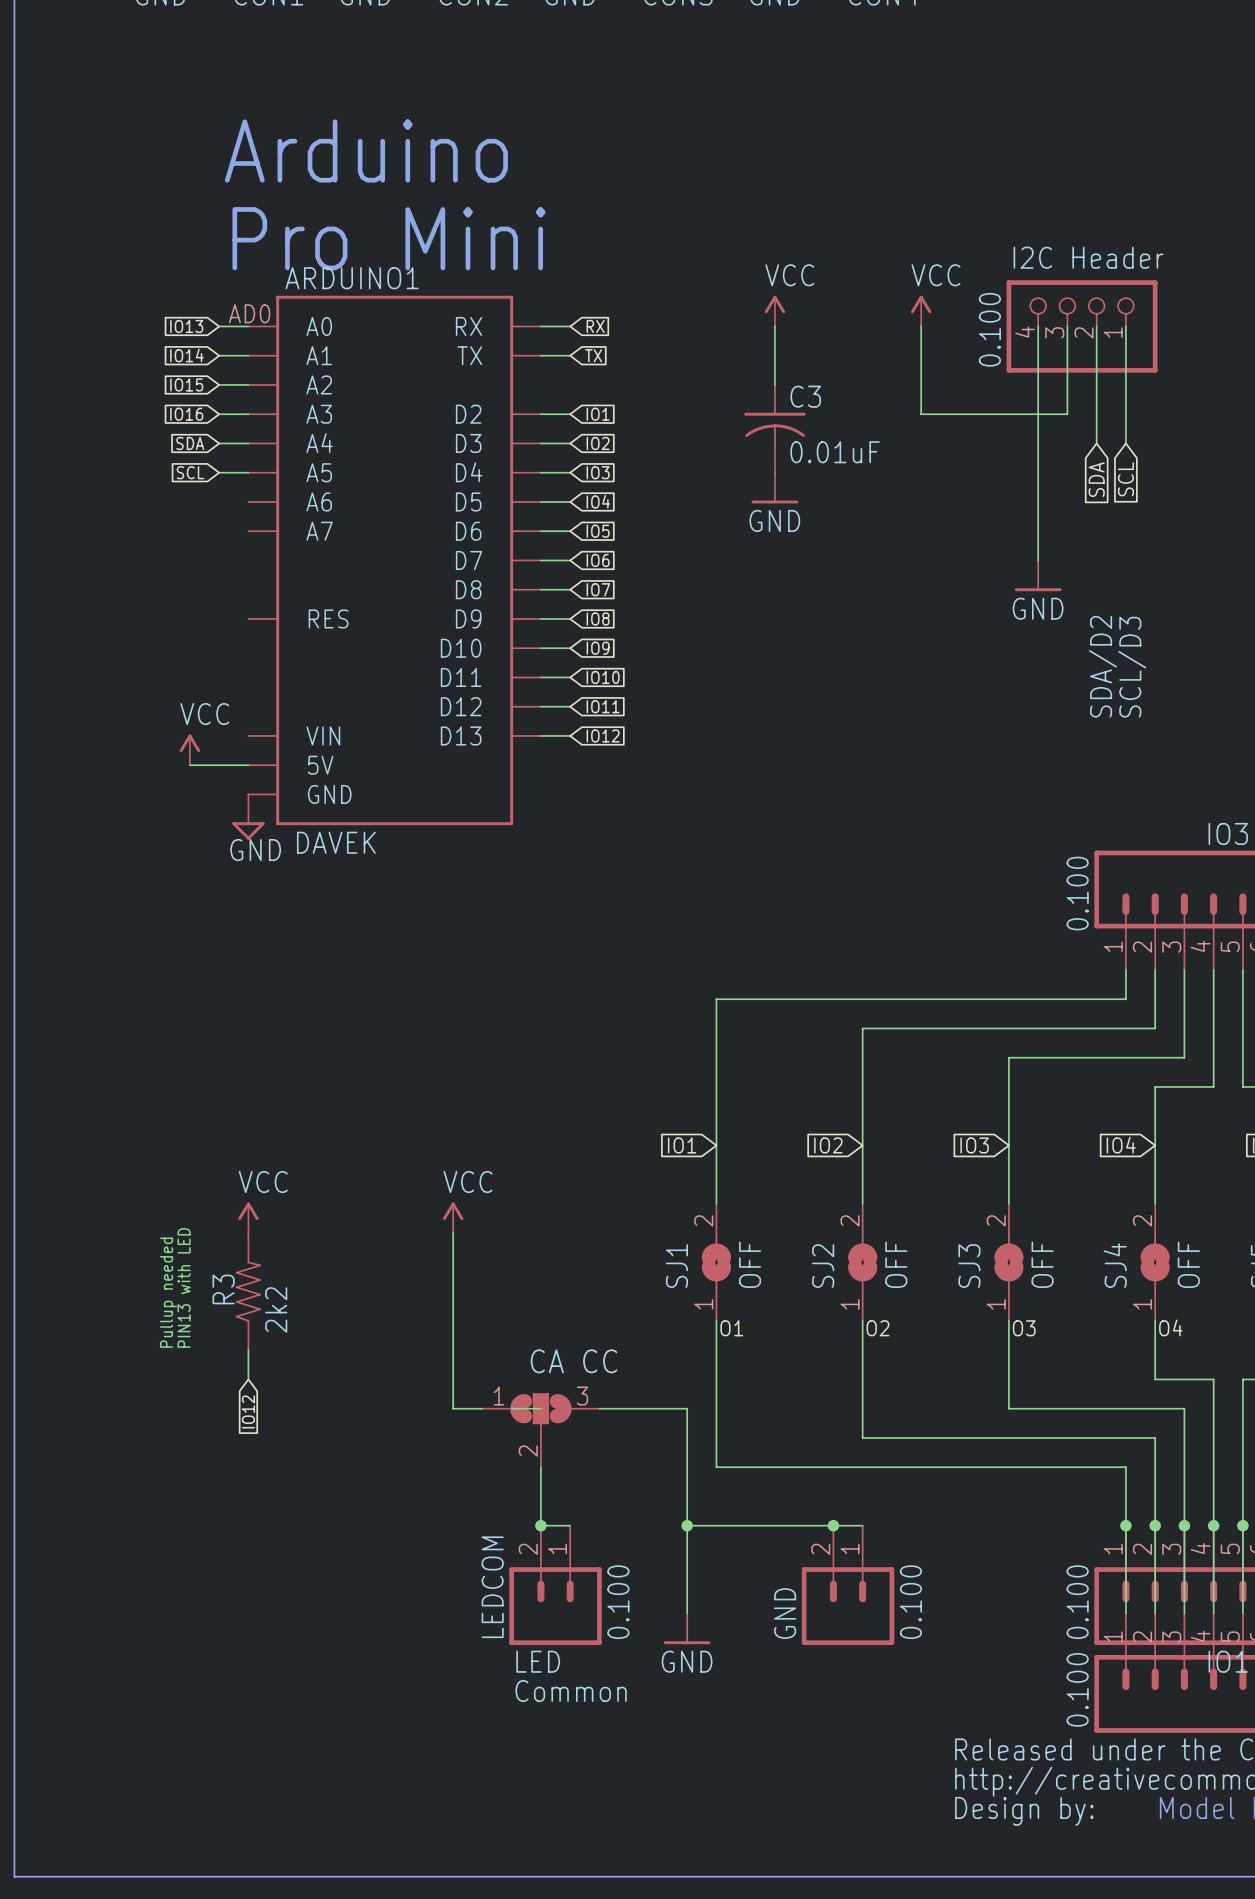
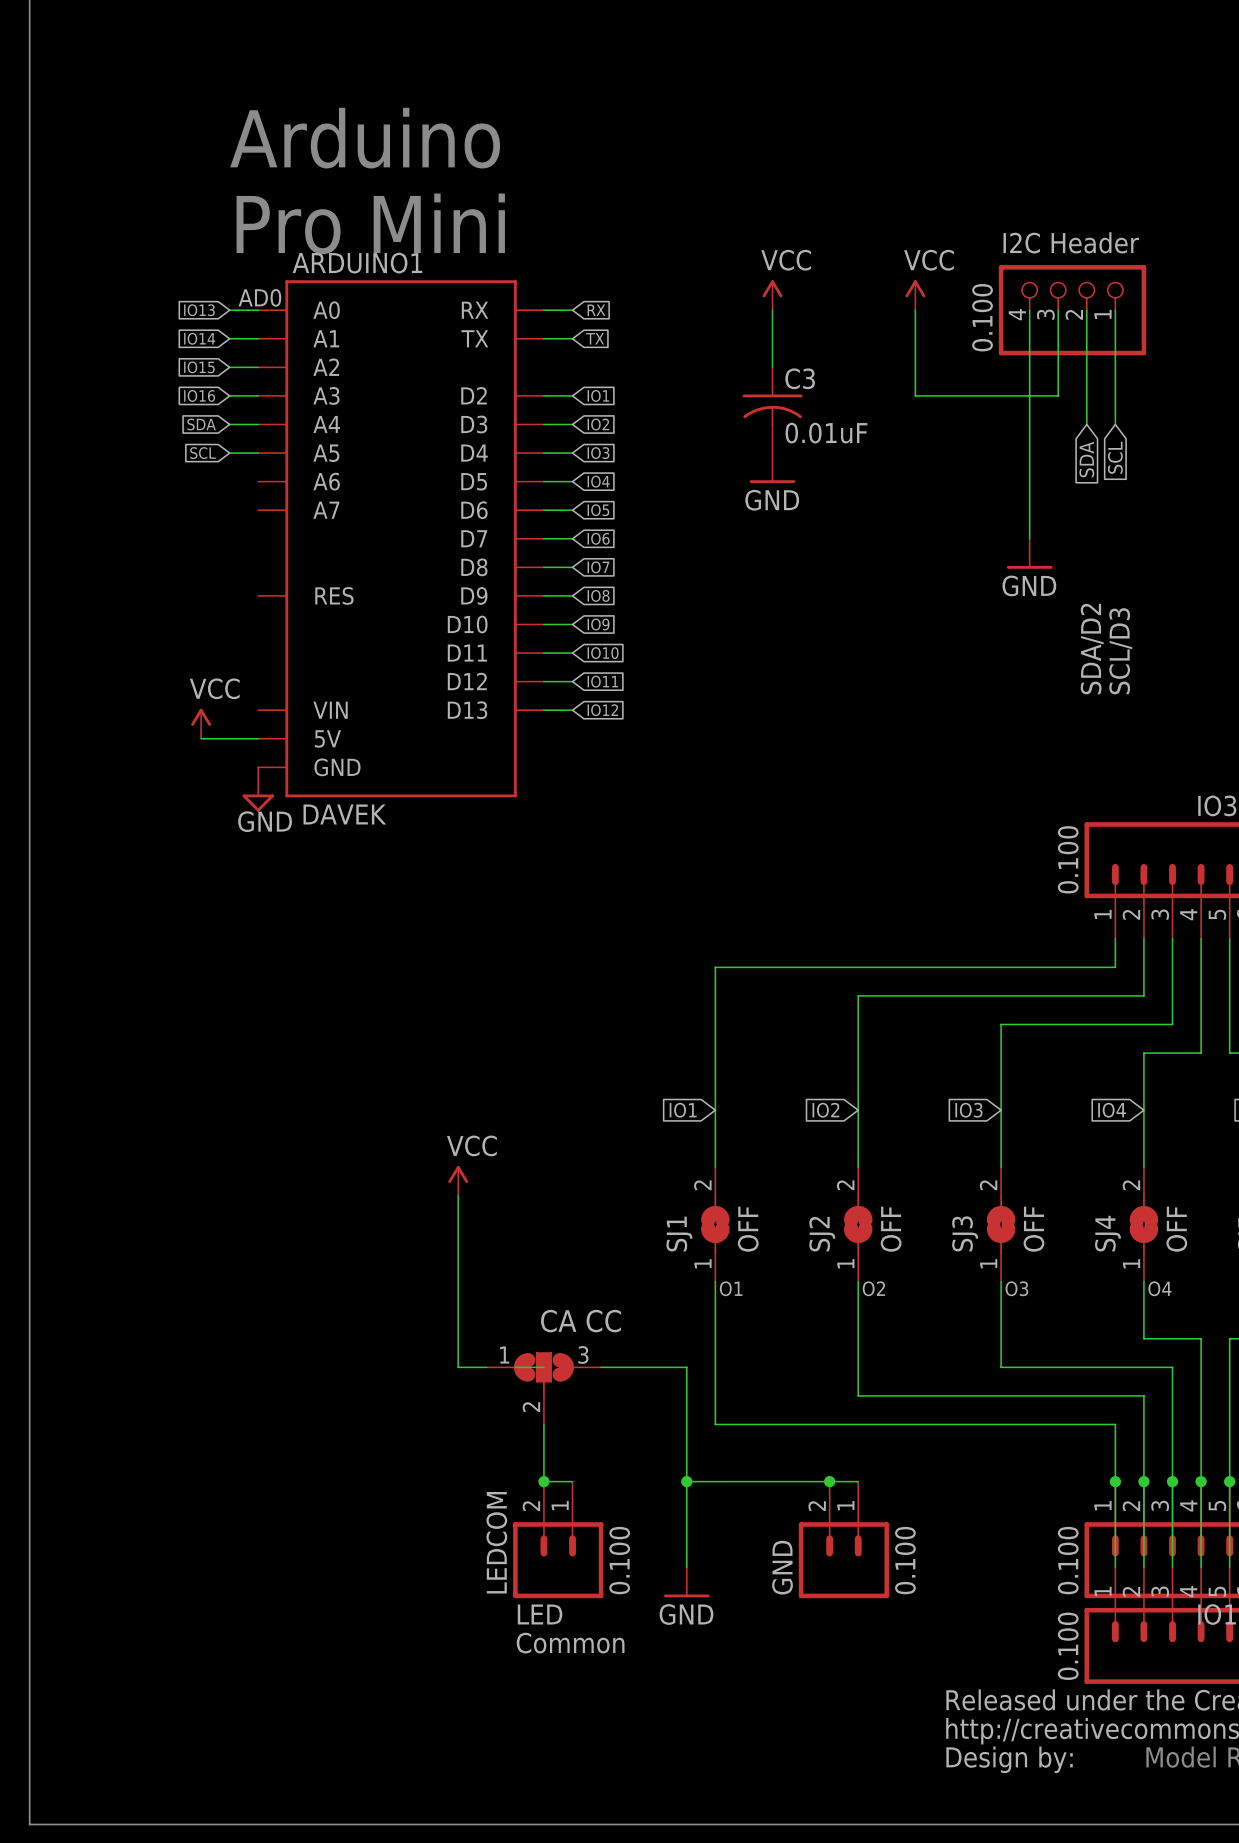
power symbol: VCC (248, 1217) -> none
text: PIN13 with LED (184, 1287) -> none
R3: 2k2 (248, 1291) -> none
text: Pullup needed (168, 1292) -> none
wire: (248, 1350) (248, 1379) -> none
global label: IO12 (248, 1411) -> none

